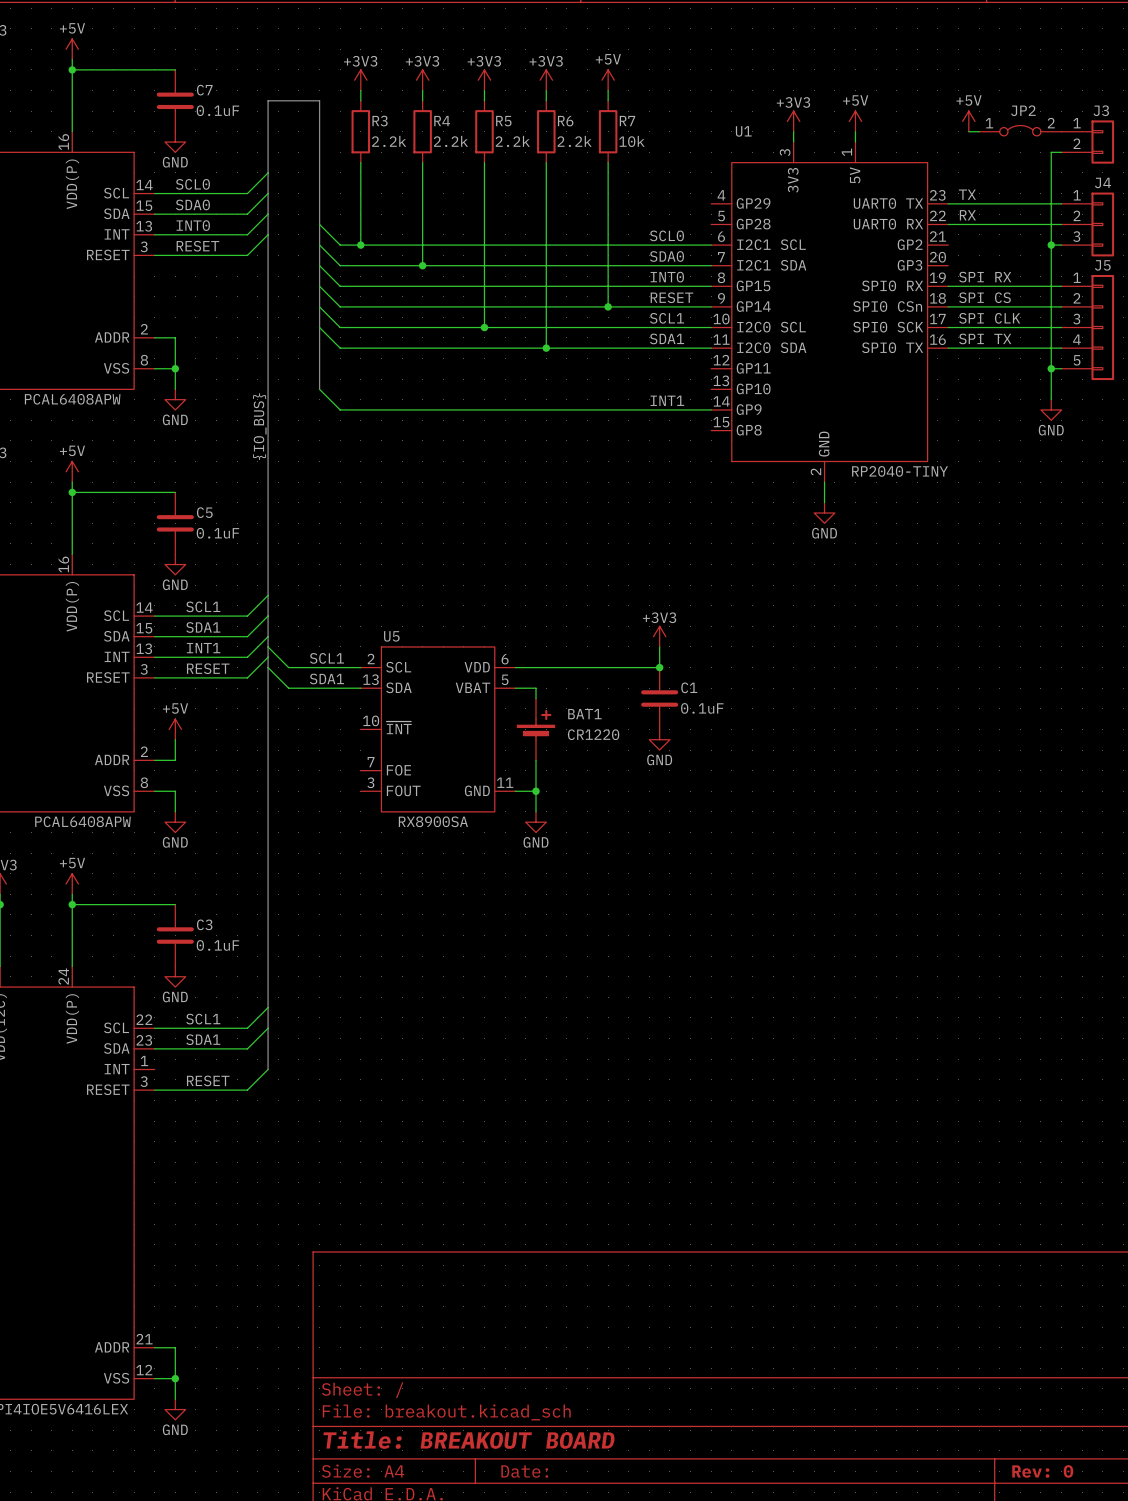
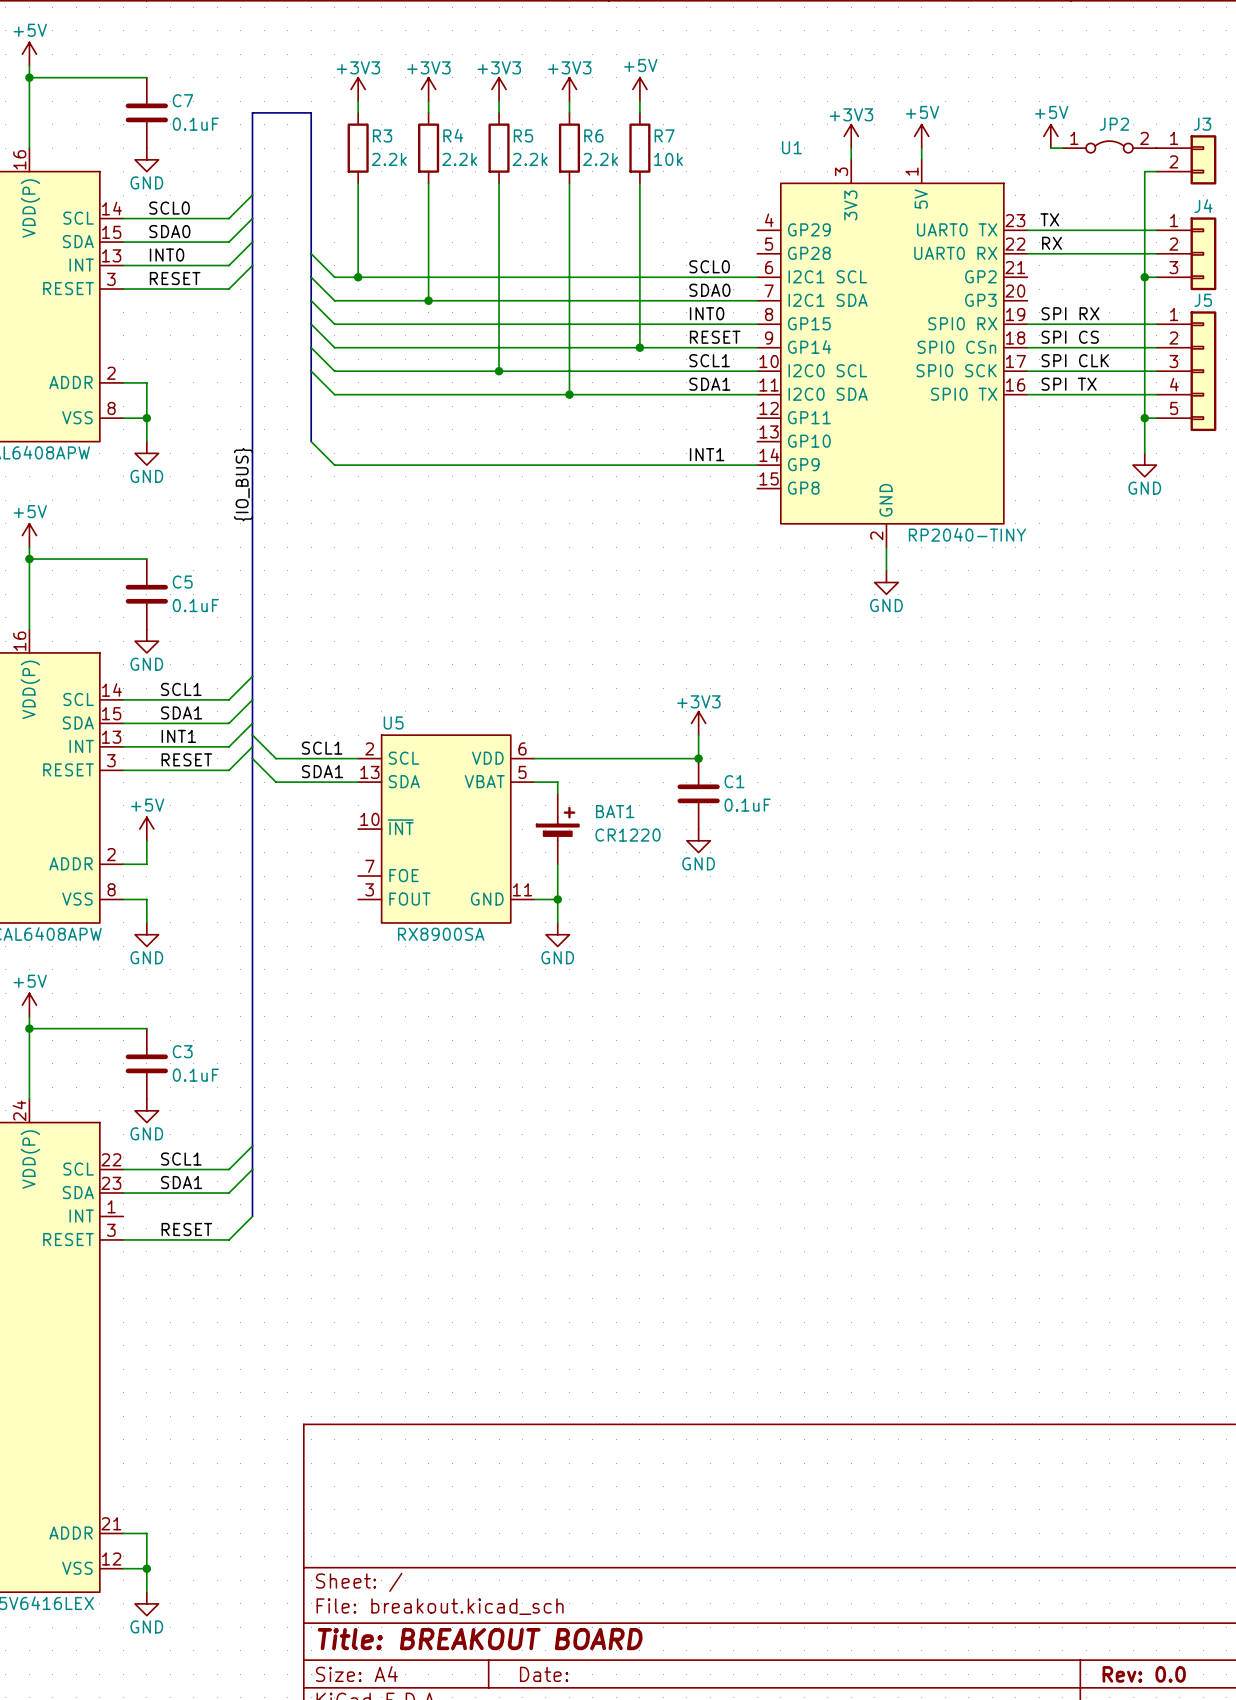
title block: Rev: 0 (1042, 1471) -> Rev: 0.0 (1144, 1674)

